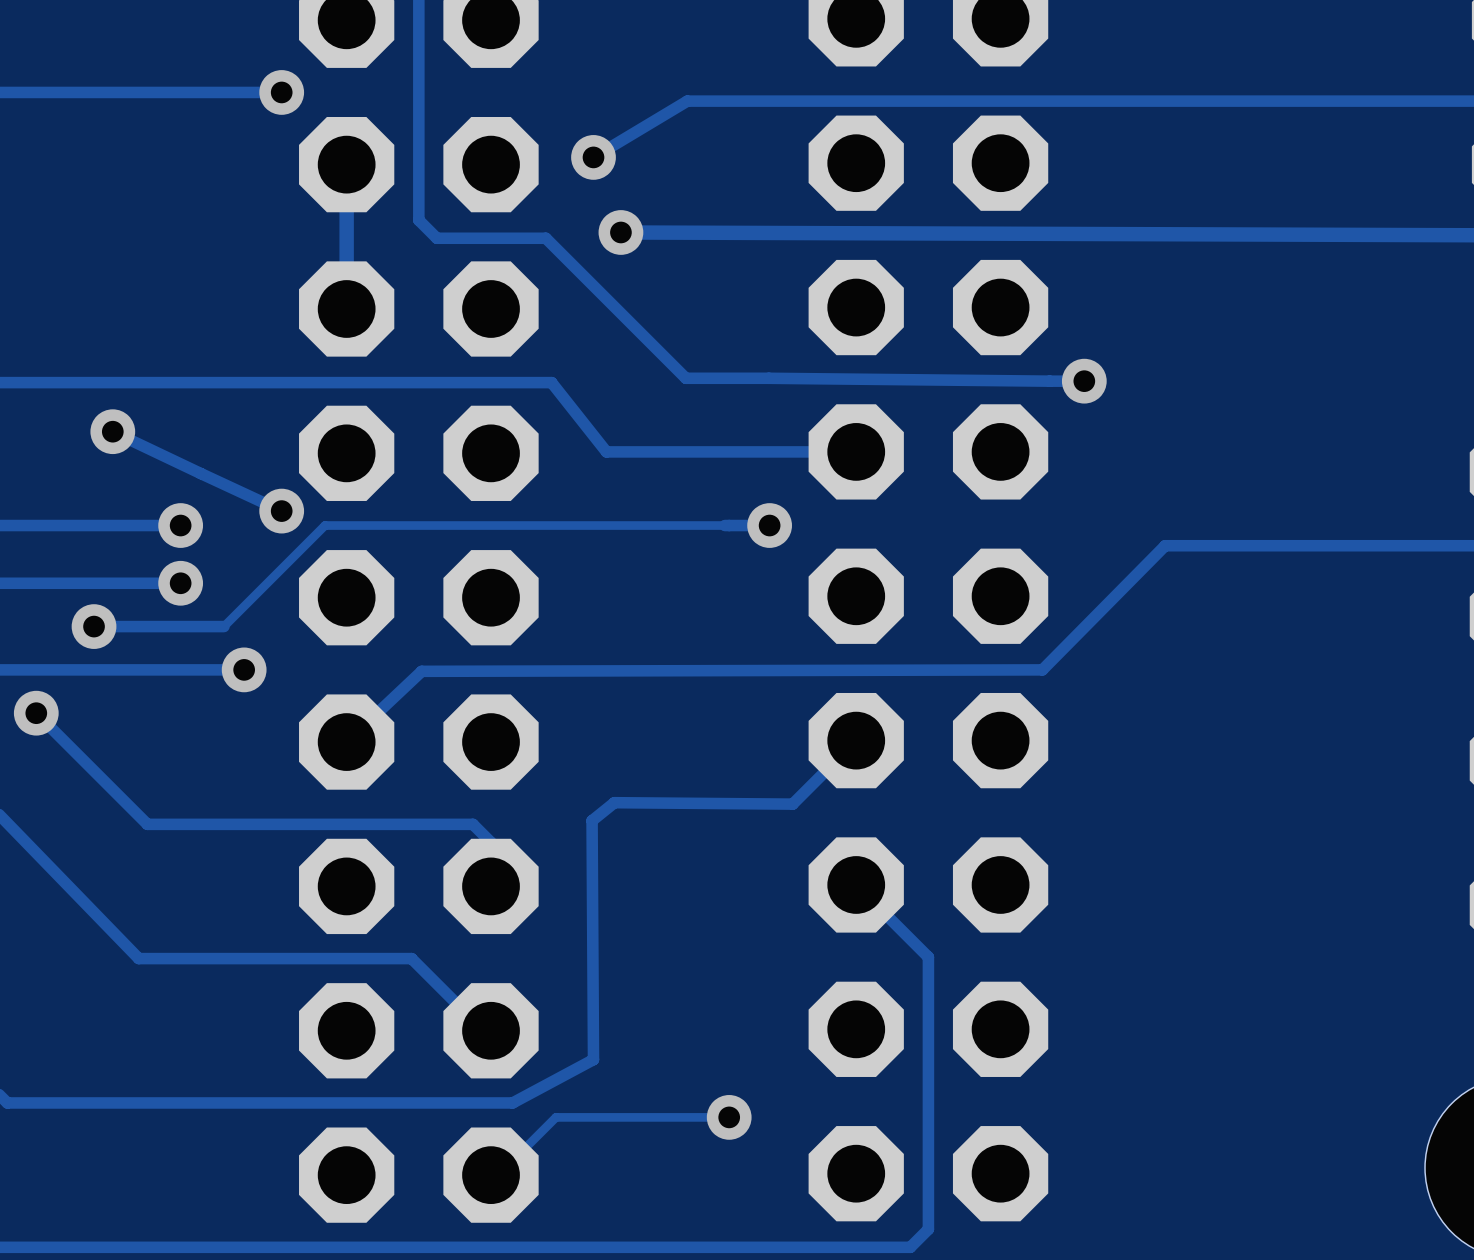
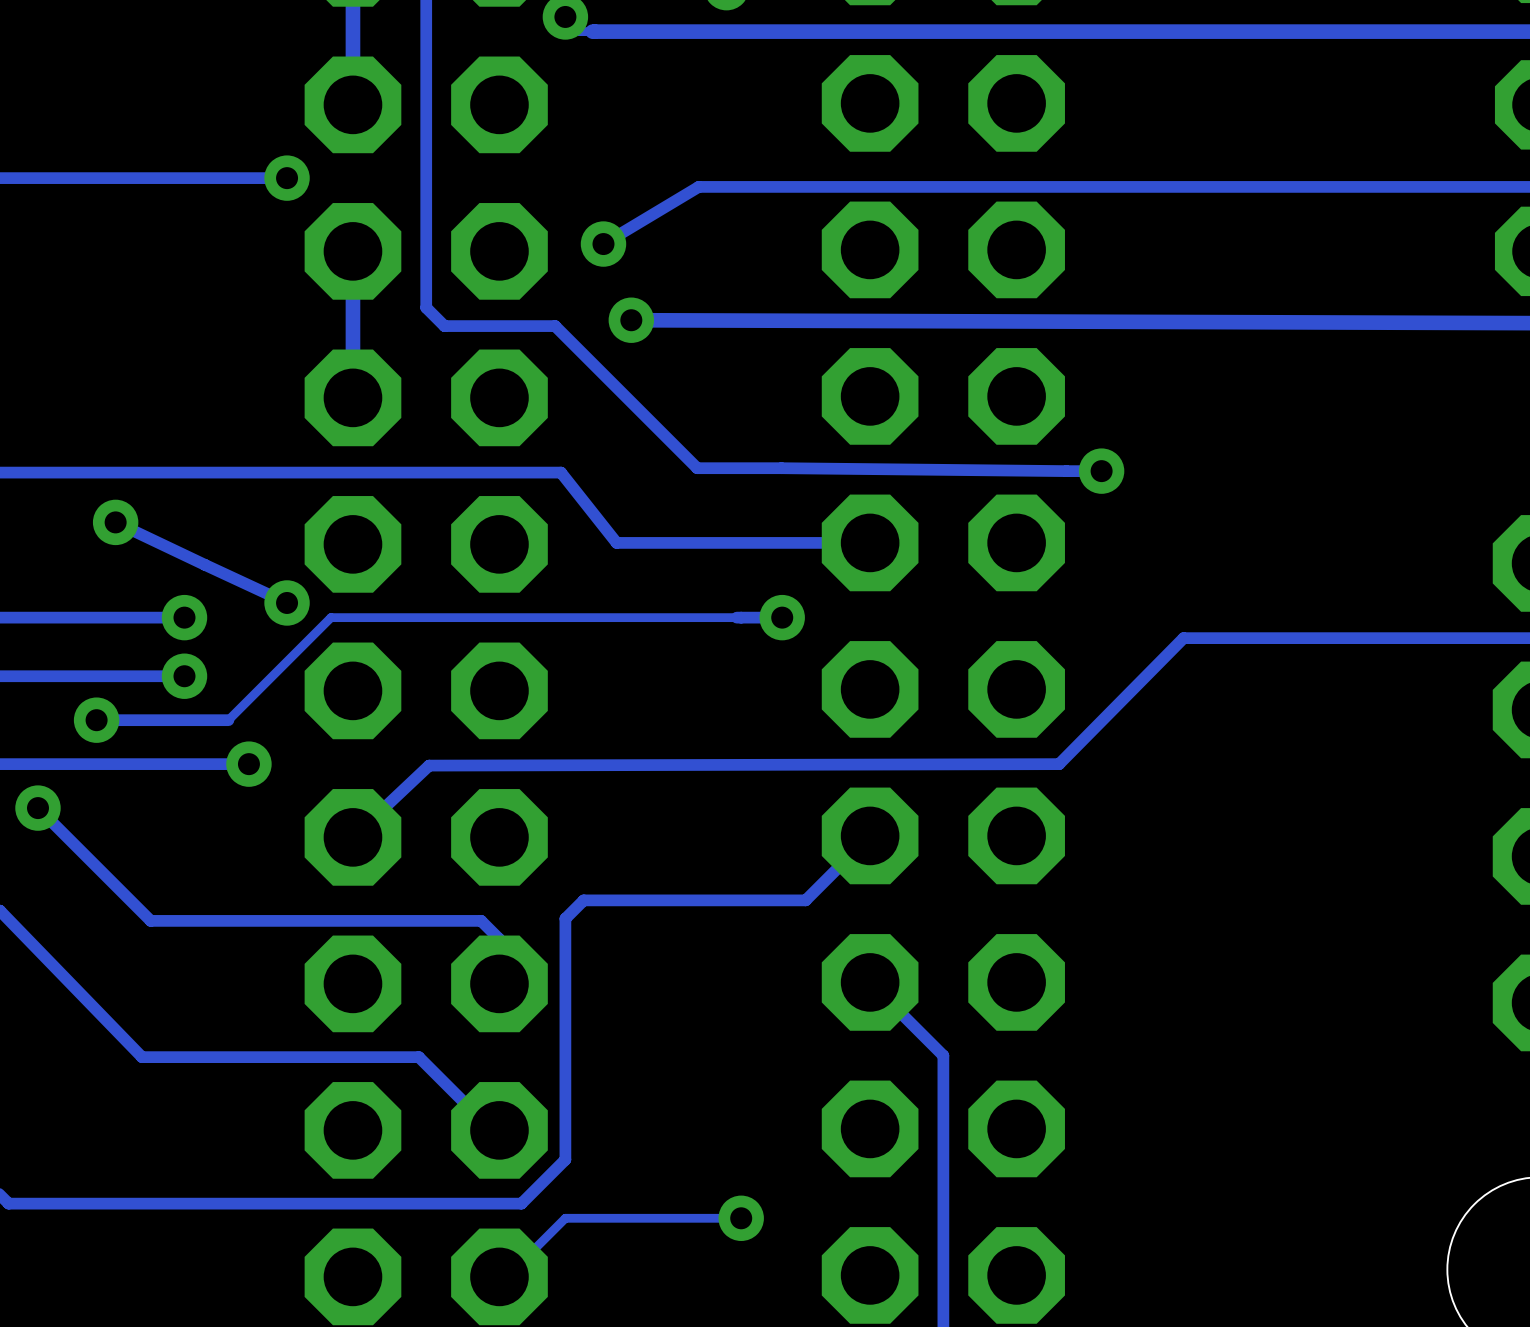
track: (792, 804) (614, 802) (592, 820) (593, 1059) (512, 1102) -> (805, 900) (583, 900) (565, 918) (565, 1159) (521, 1203)

